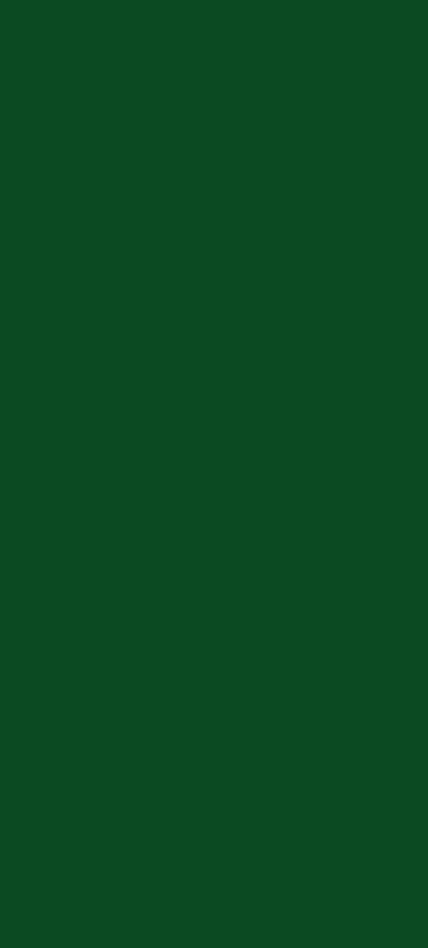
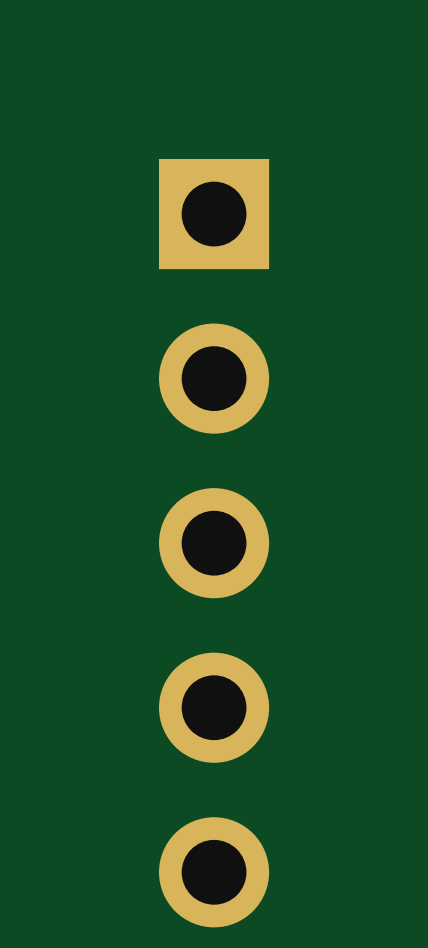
part: none -> (214, 543)

